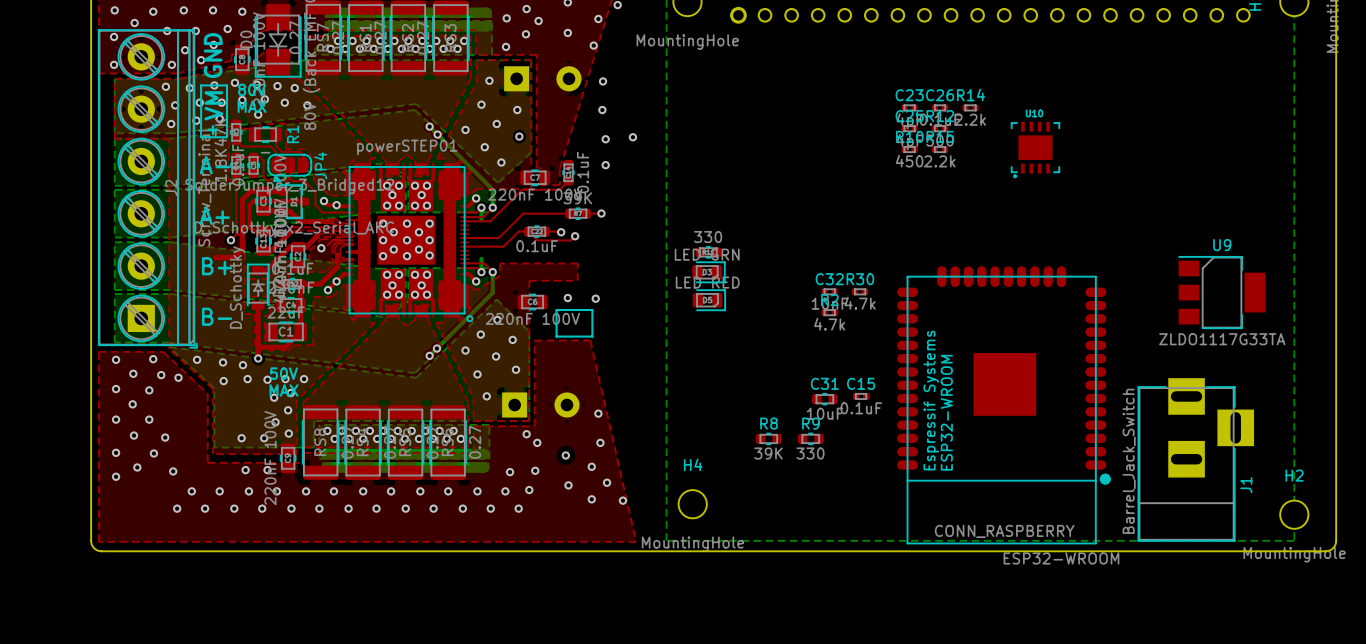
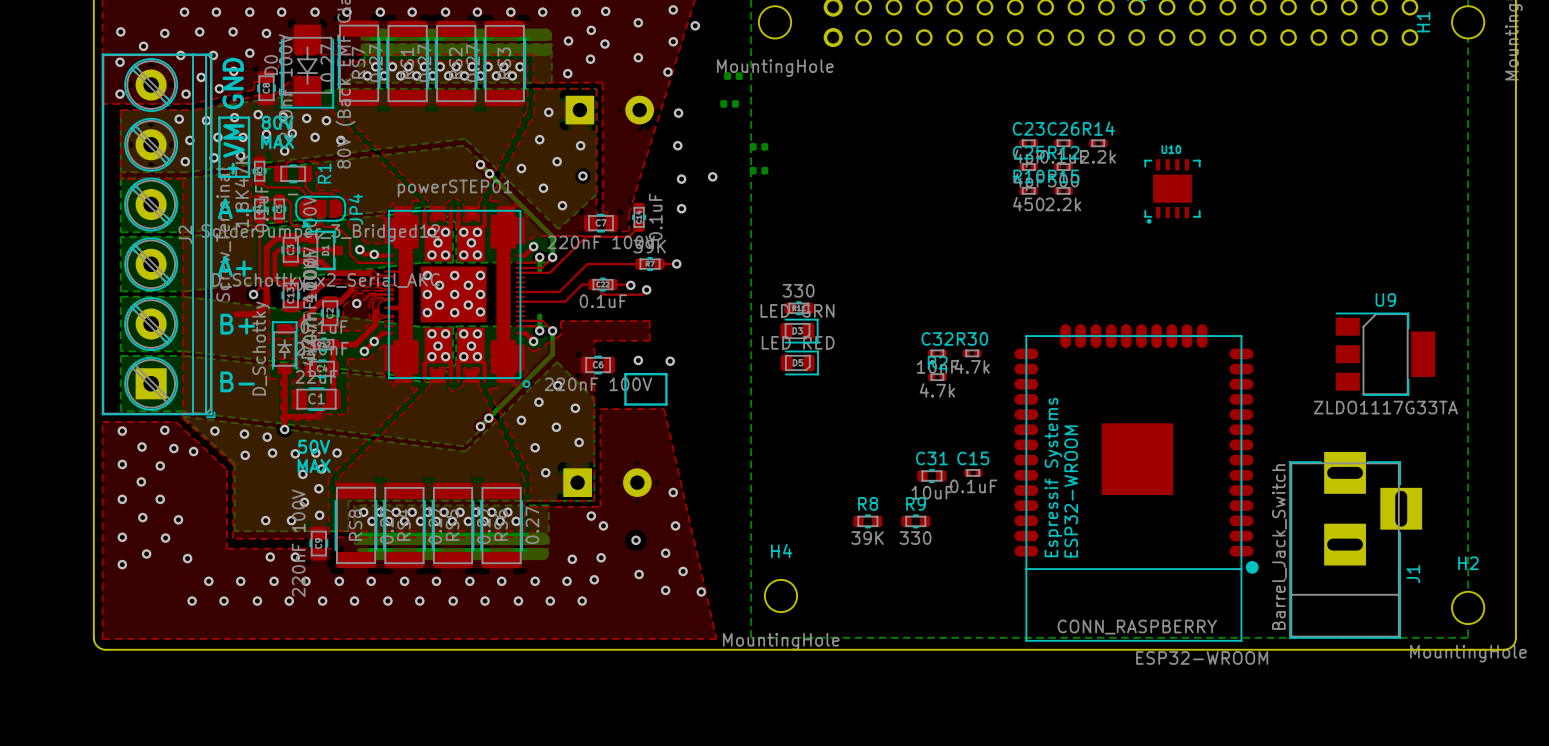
part: none -> (733, 76)
part: none -> (729, 103)
part: none -> (759, 146)
part: none -> (759, 170)

